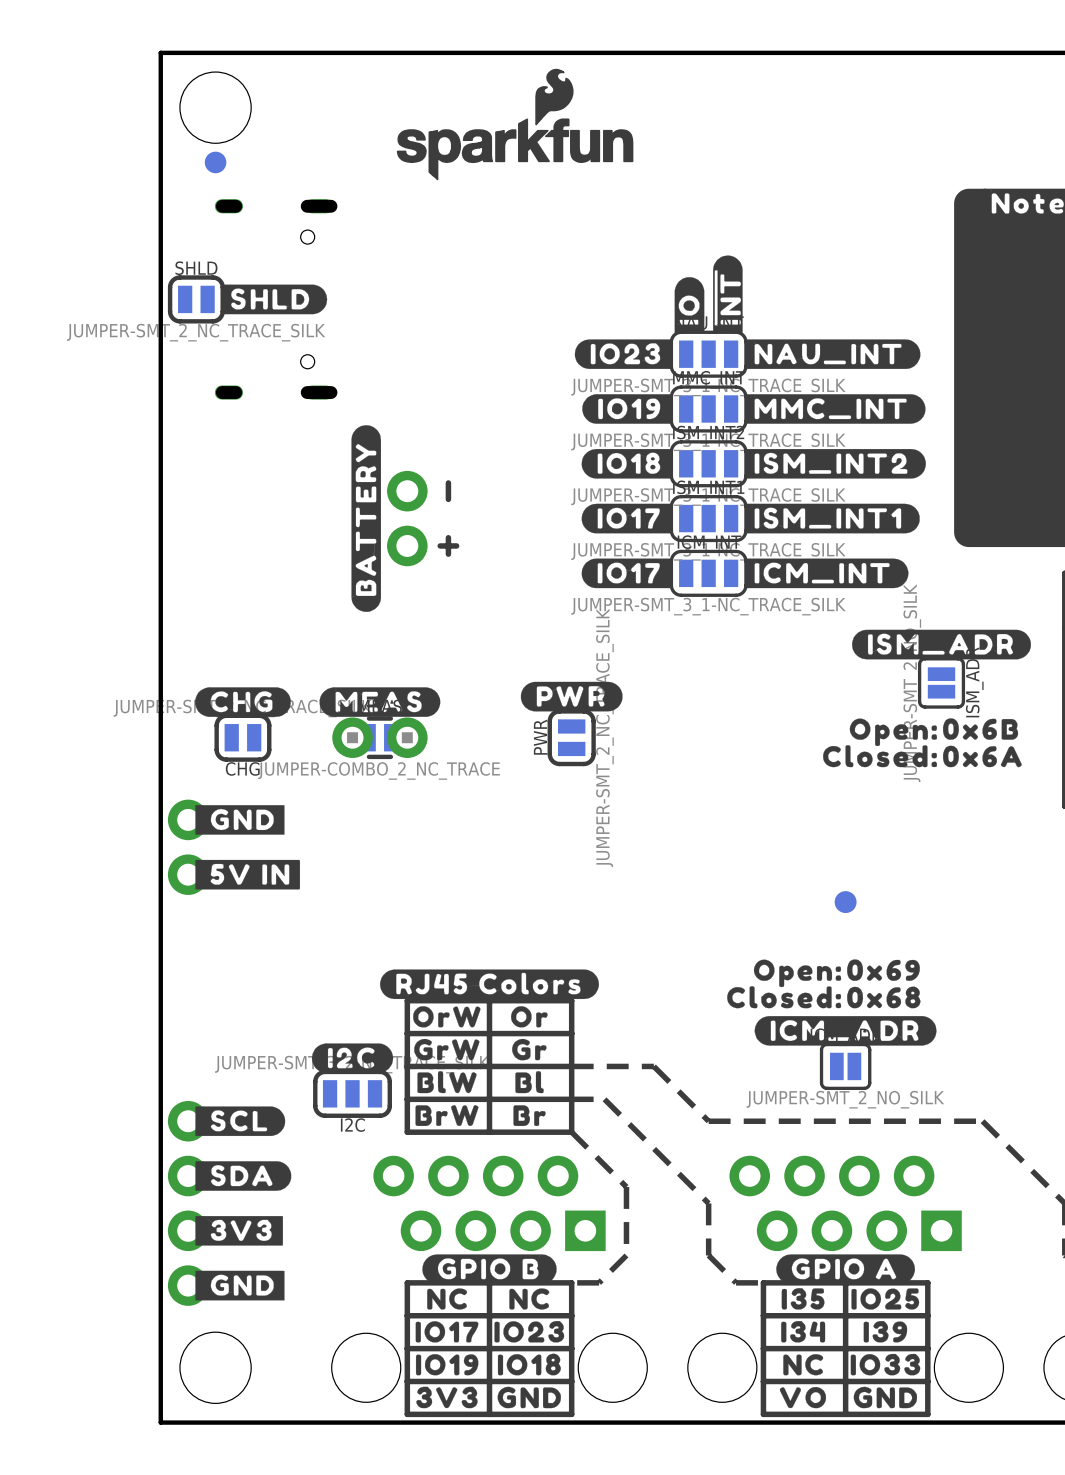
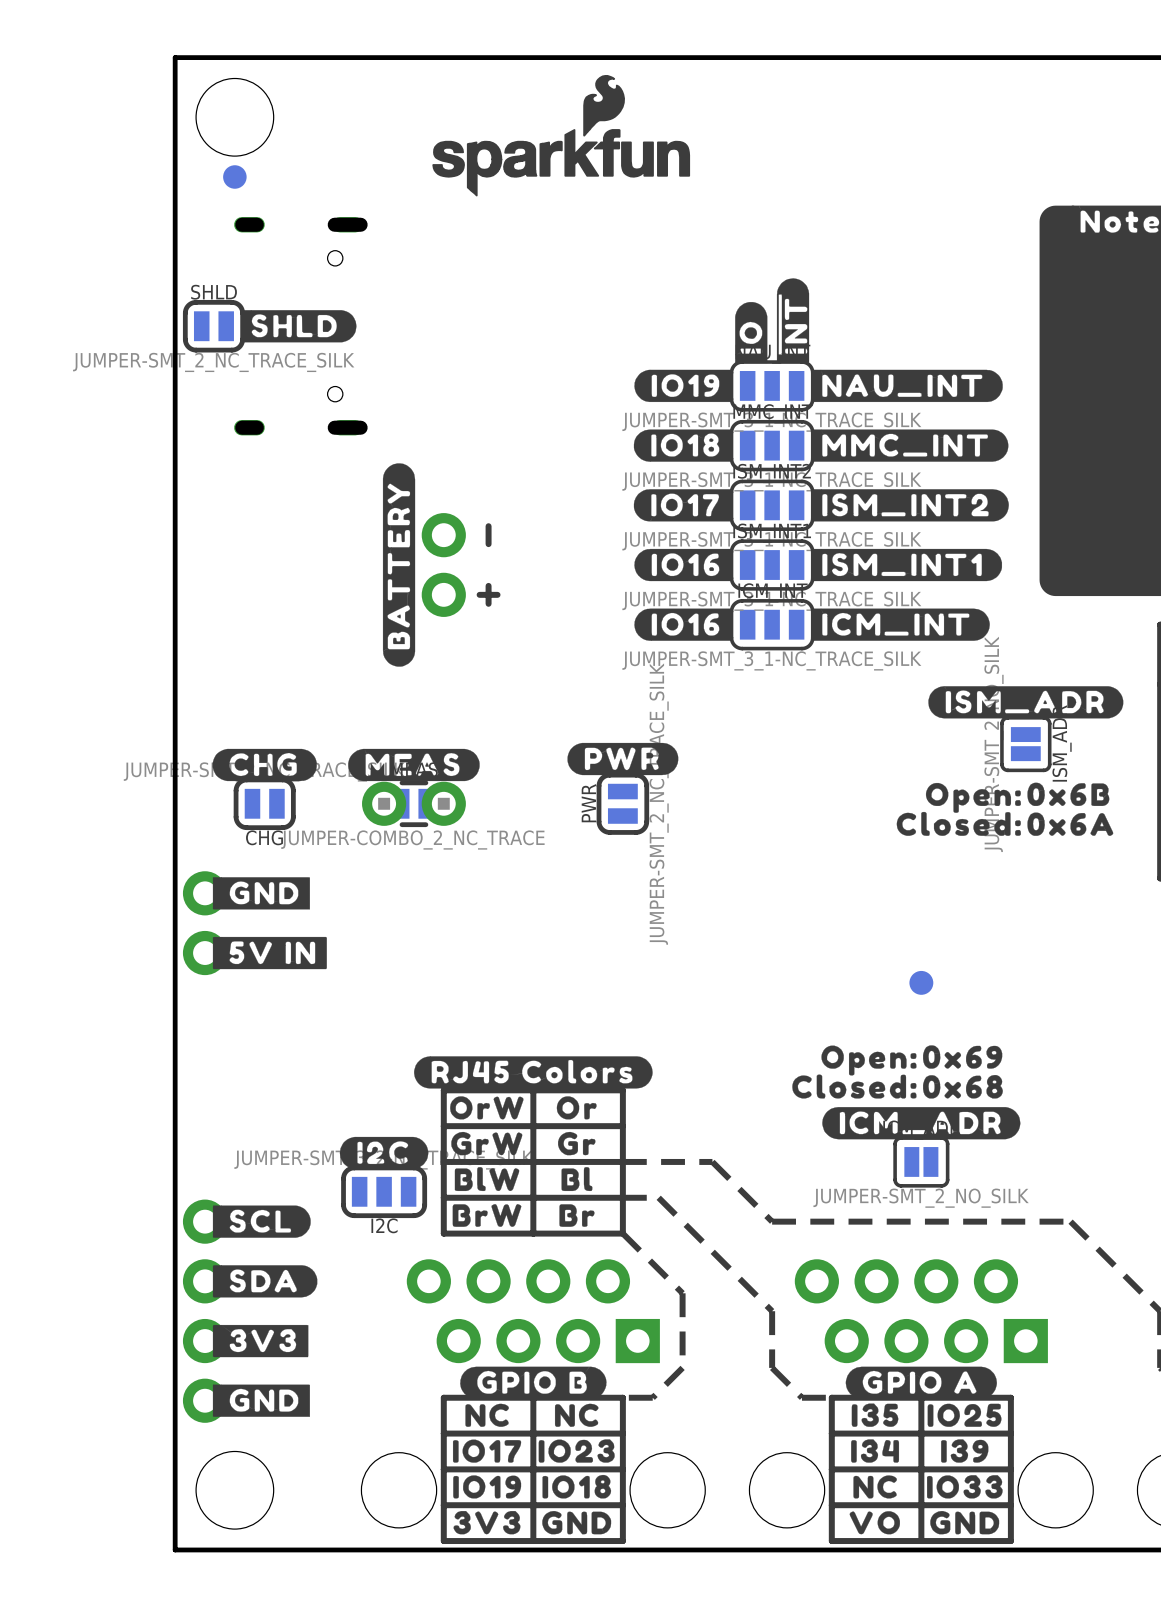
drawing: [574, 339, 672, 369] -> none
drawing position: (626, 408) -> (682, 385)
drawing: none -> [633, 489, 732, 522]
drawing position: (626, 463) -> (682, 445)
drawing shape: [581, 503, 672, 534] -> [634, 548, 732, 582]
drawing shape: [581, 558, 672, 589] -> [634, 608, 732, 641]

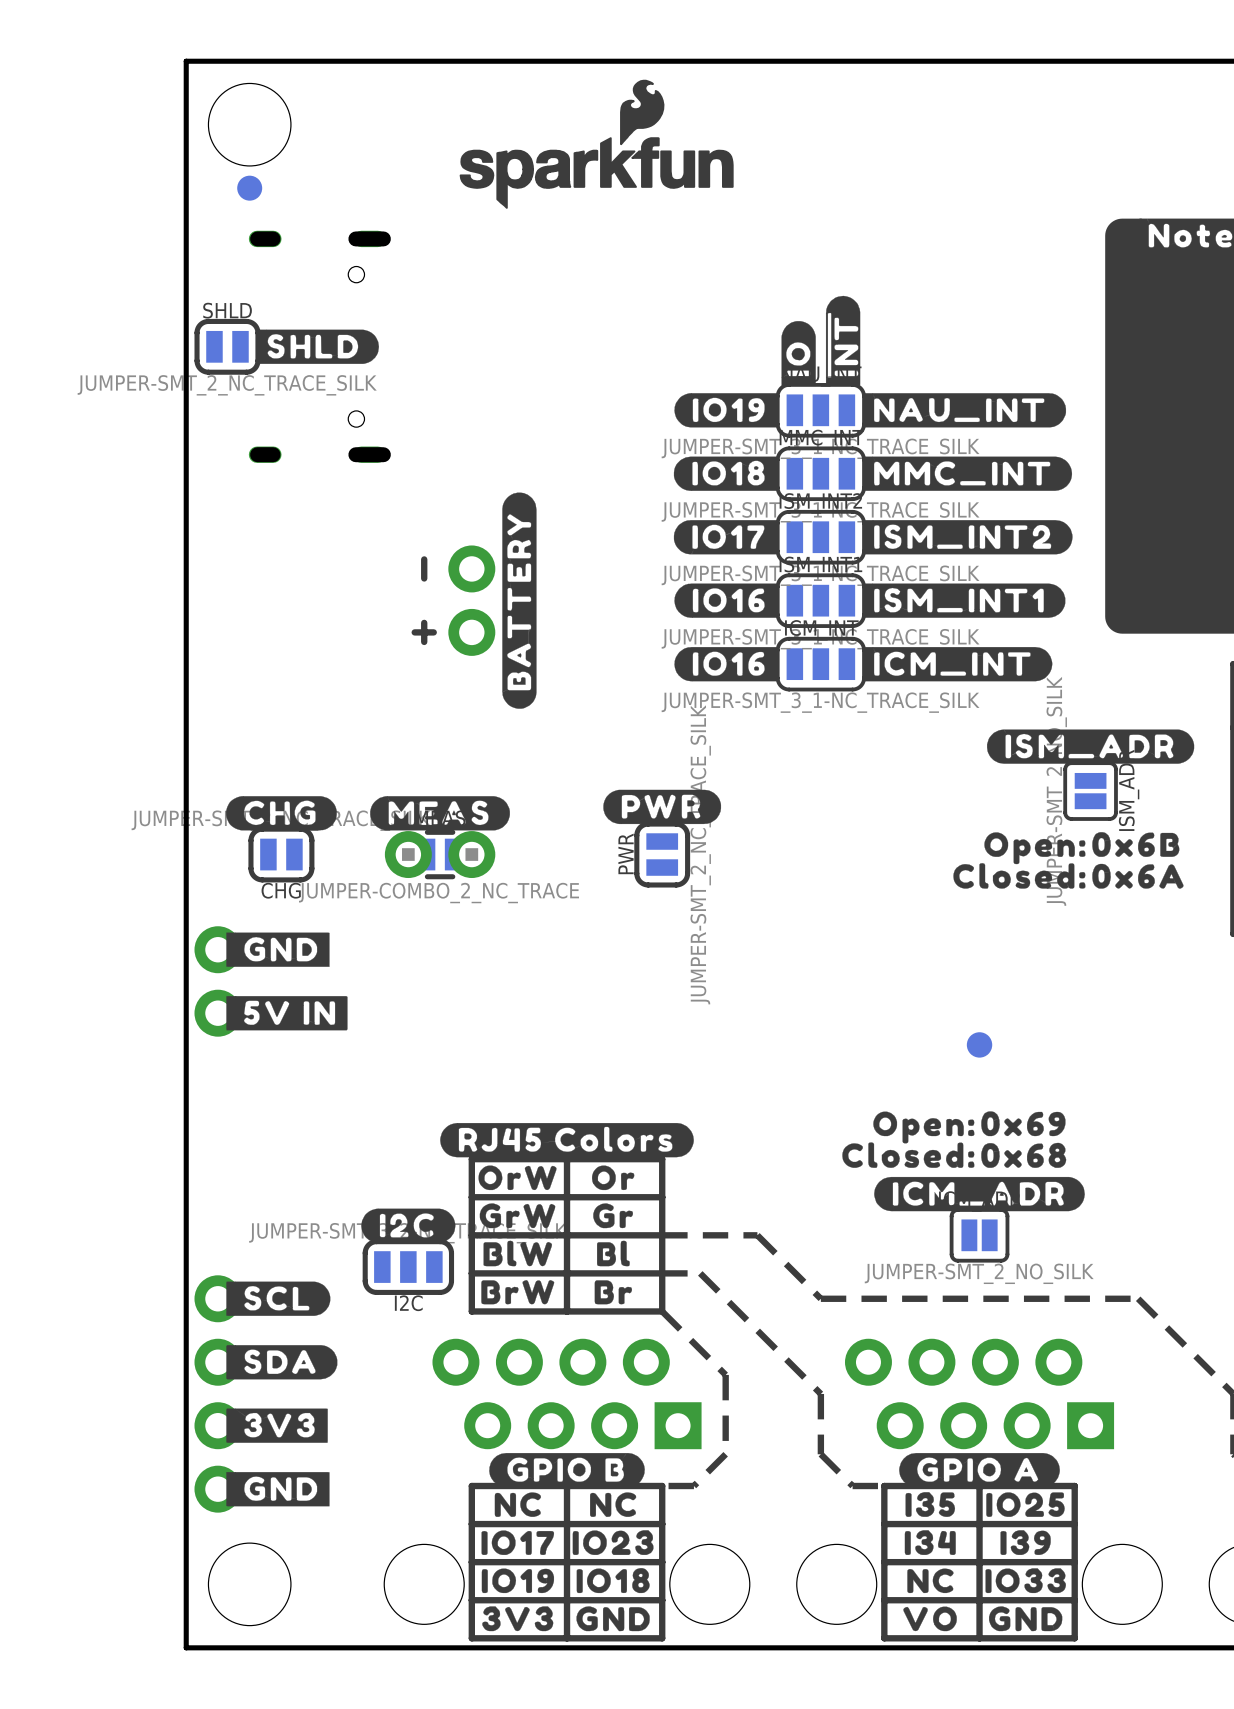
line: (488, 526) (488, 544) -> (424, 559) (424, 578)
drawing position: (399, 565) -> (519, 600)
line: (488, 585) (488, 603) -> (424, 622) (424, 641)
line: (497, 594) (479, 594) -> (433, 632) (414, 632)

